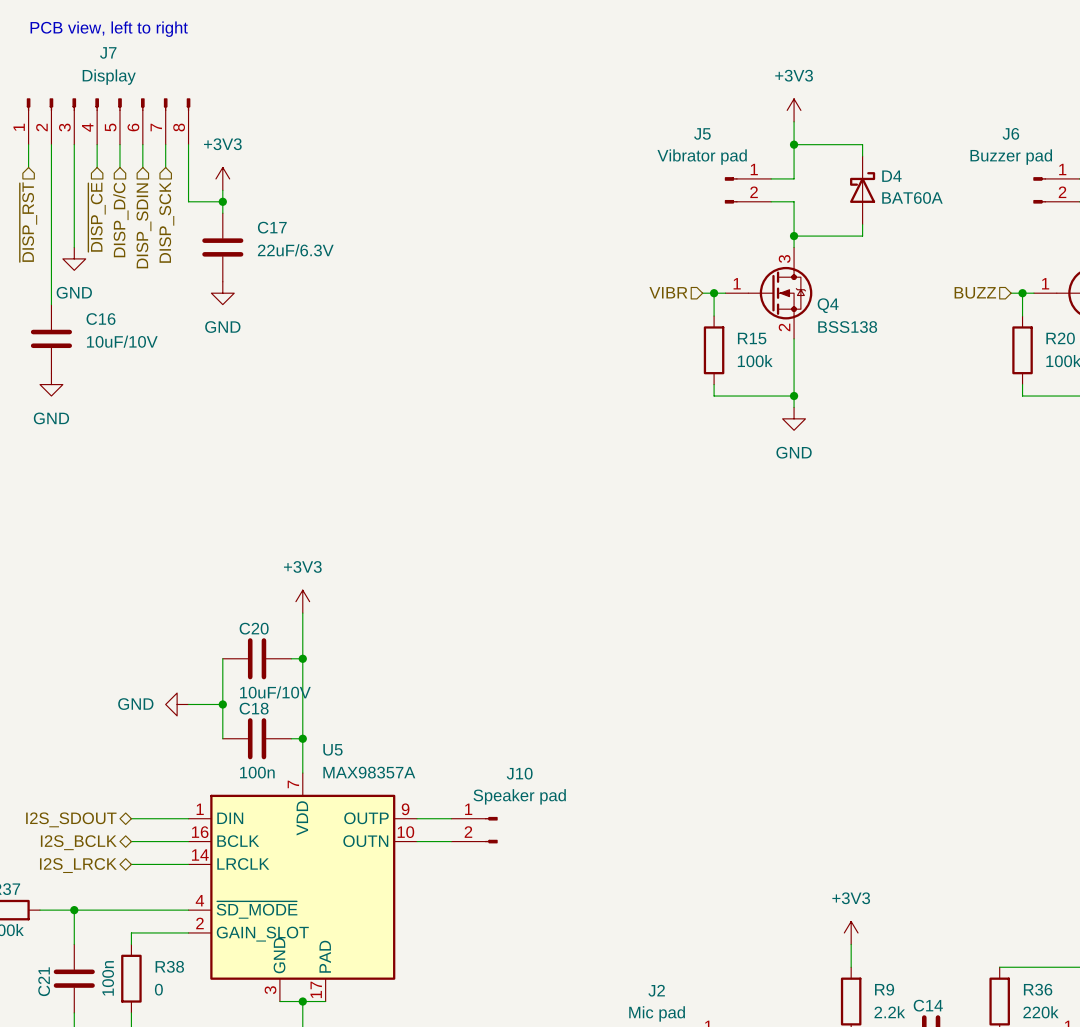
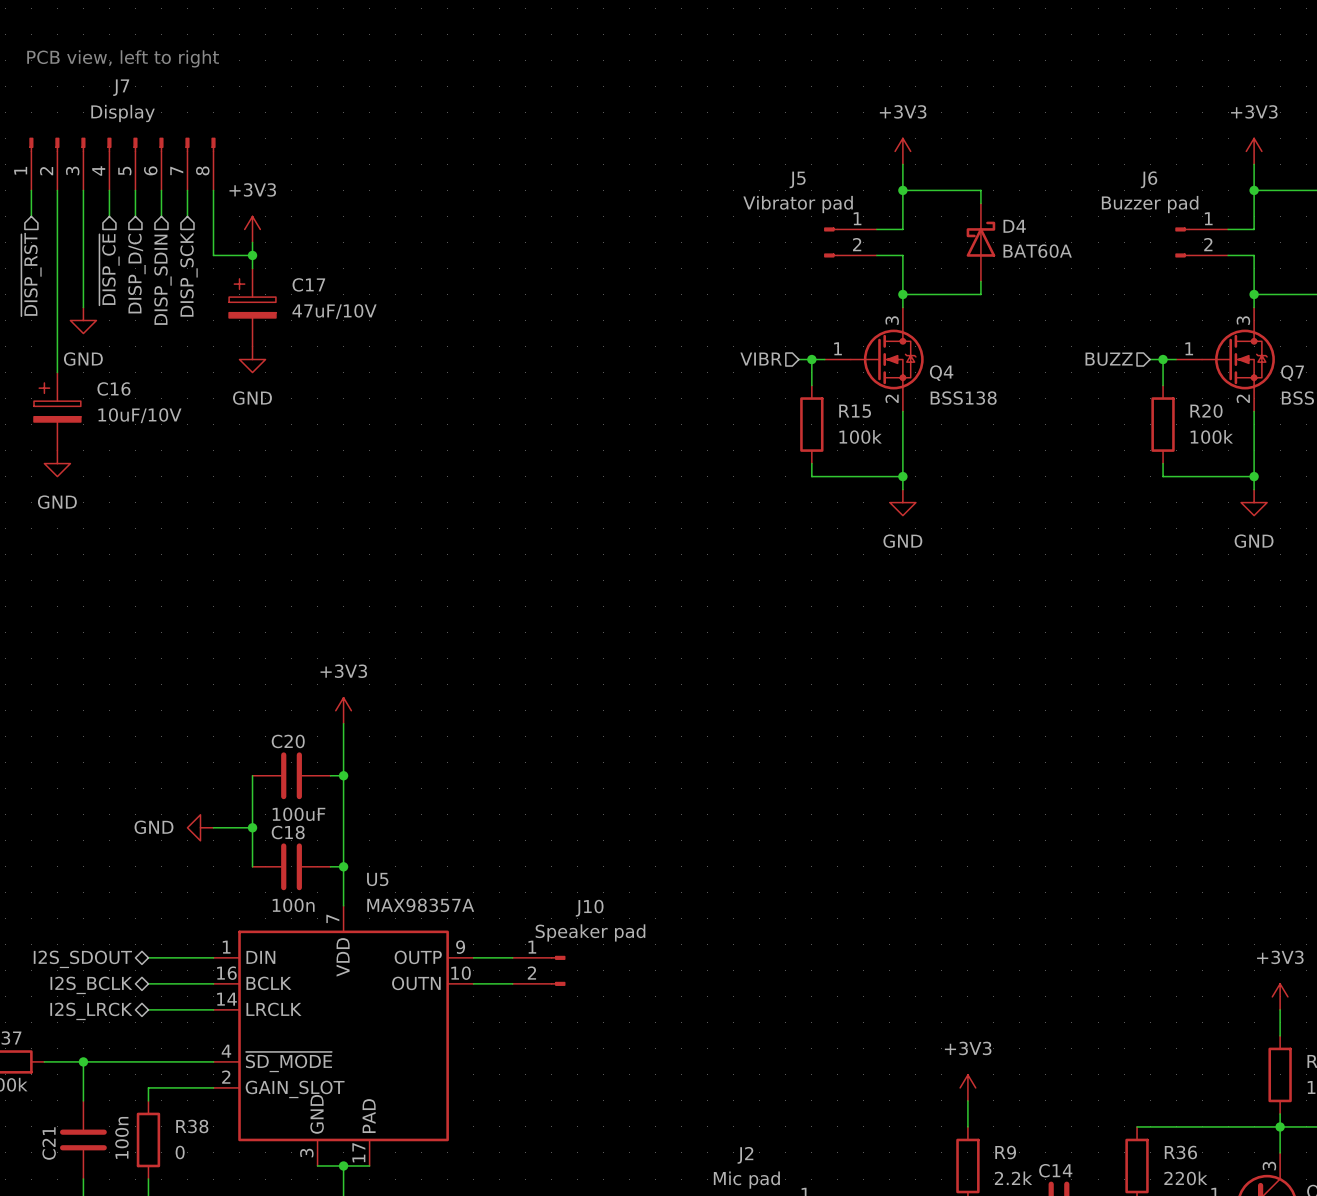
C17 symbol: [202, 213, 244, 282] -> [229, 268, 276, 347]
C17 value: 22uF/6.3V (295, 250) -> 47uF/10V (334, 311)
C16 symbol: [30, 304, 73, 374] -> [33, 372, 81, 451]
C20 value: 10uF/10V (275, 692) -> 100uF (299, 814)

